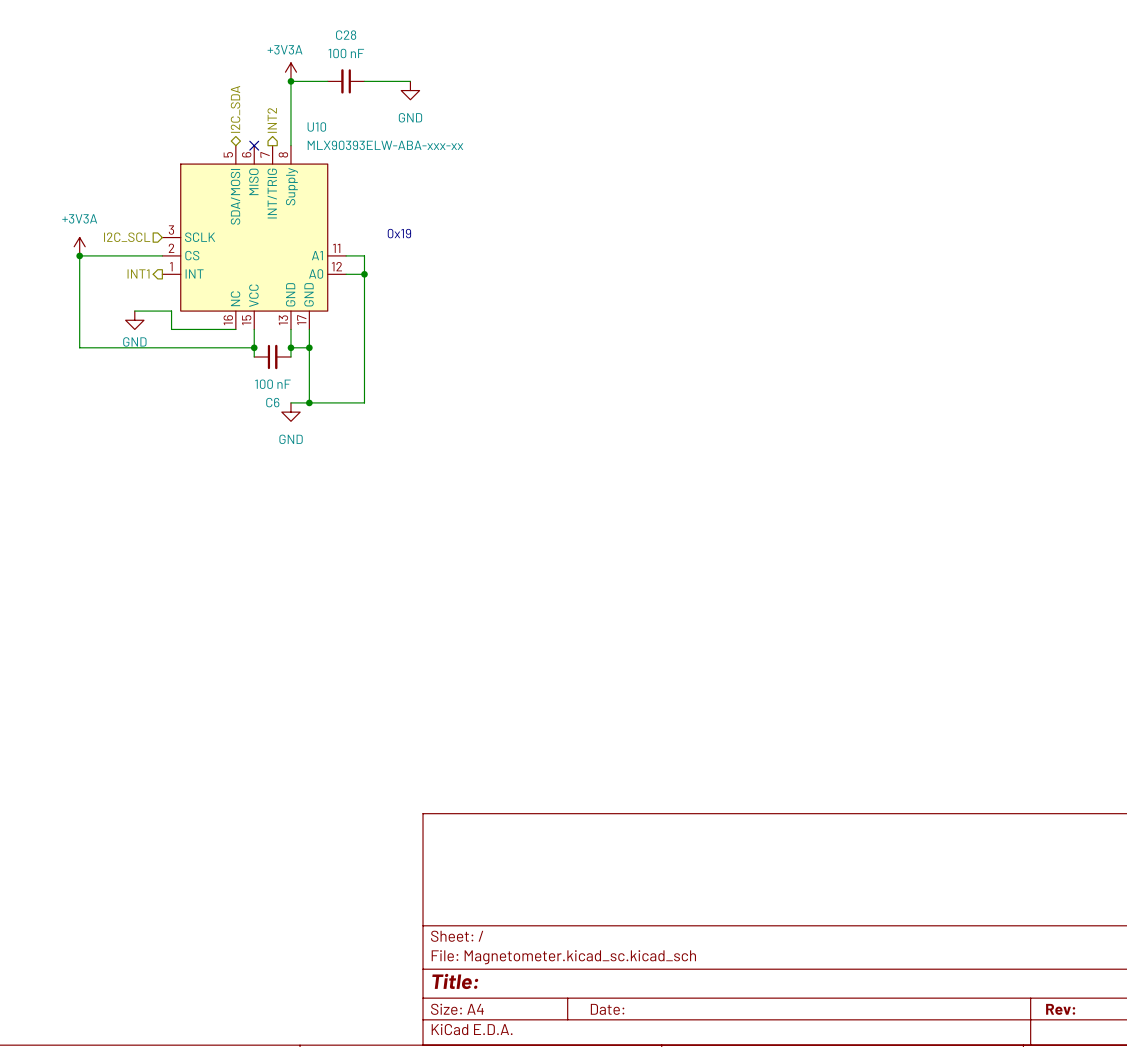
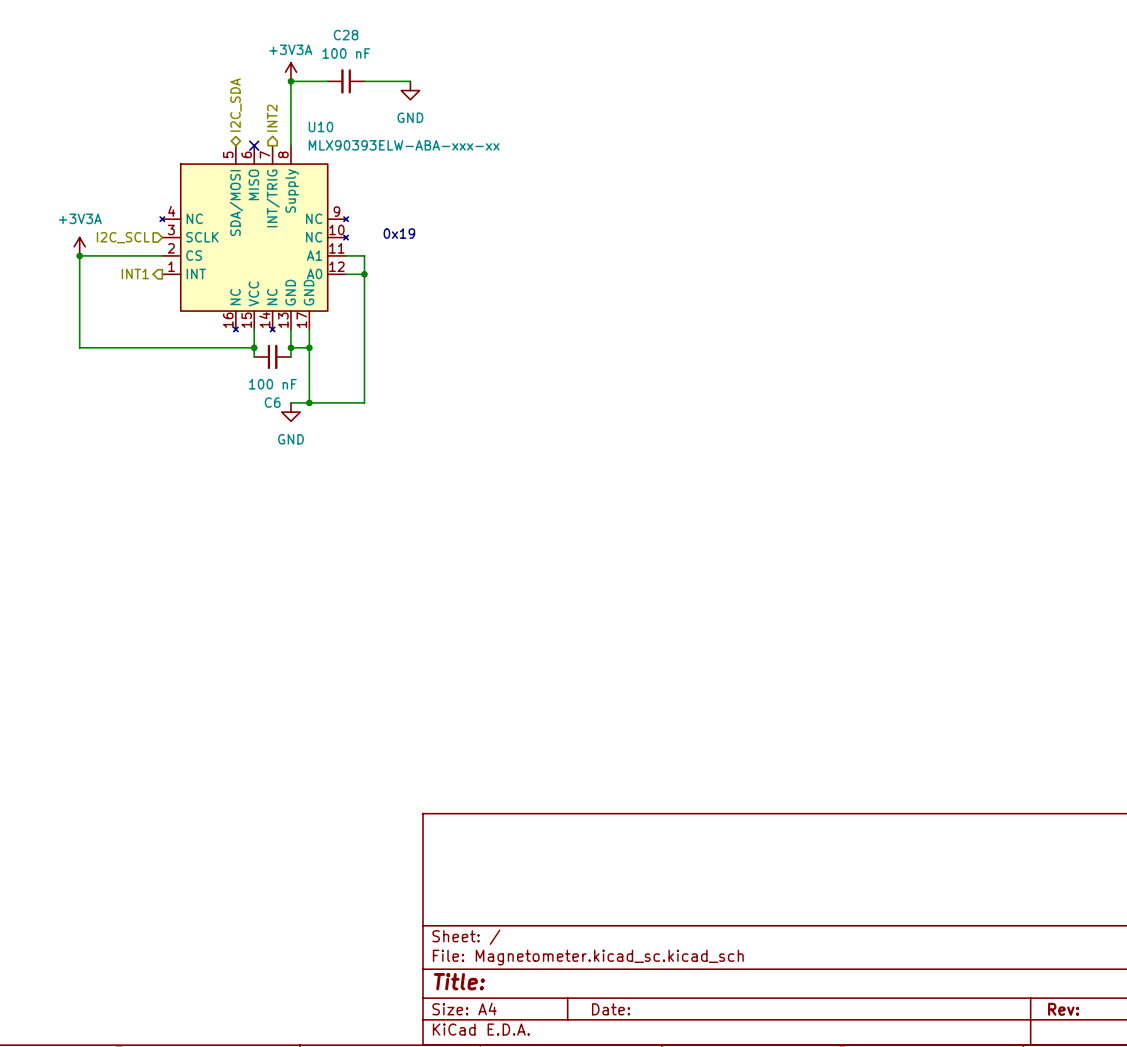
U10 symbol: [162, 145, 347, 330] -> [160, 145, 349, 332]
wire: (134, 311) (171, 311) (171, 329) (235, 329) -> none
power symbol: GND (134, 320) -> none

